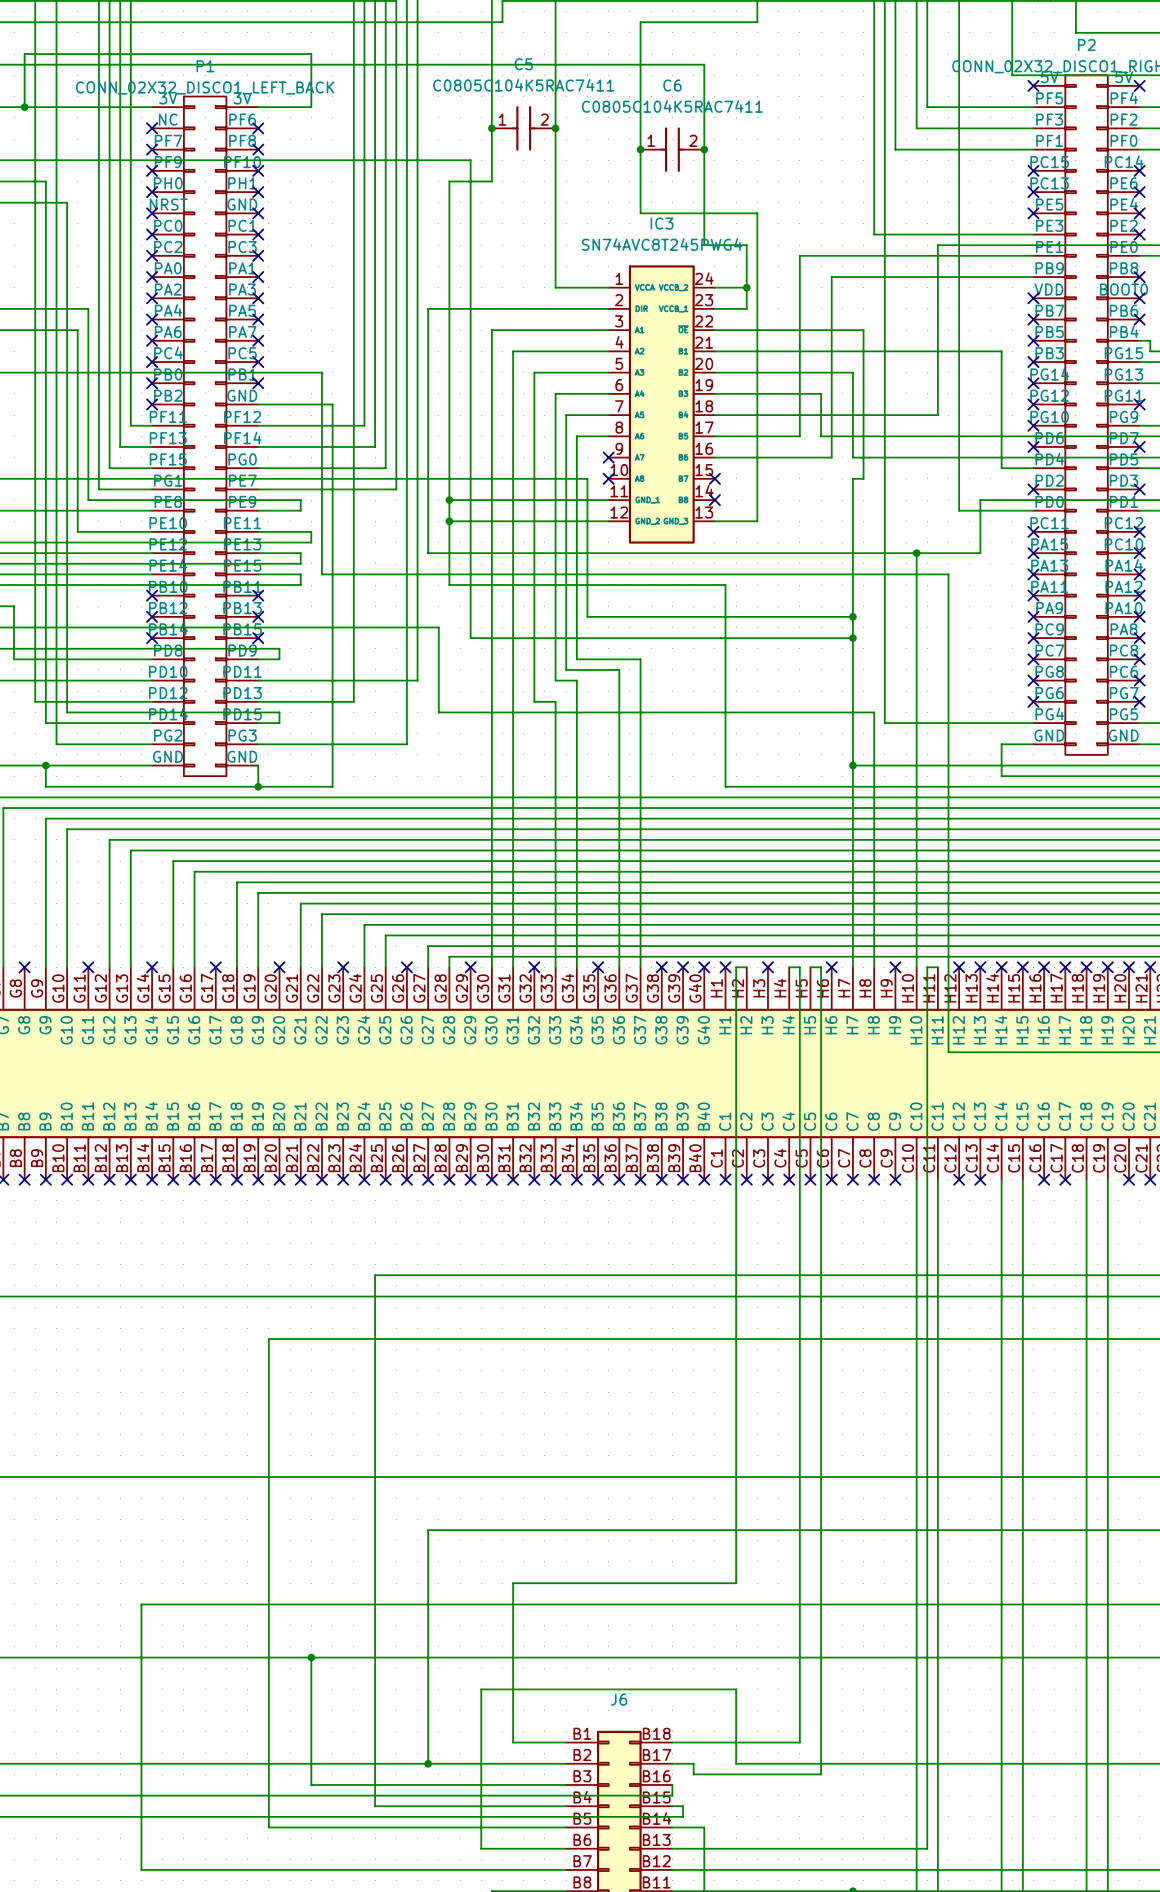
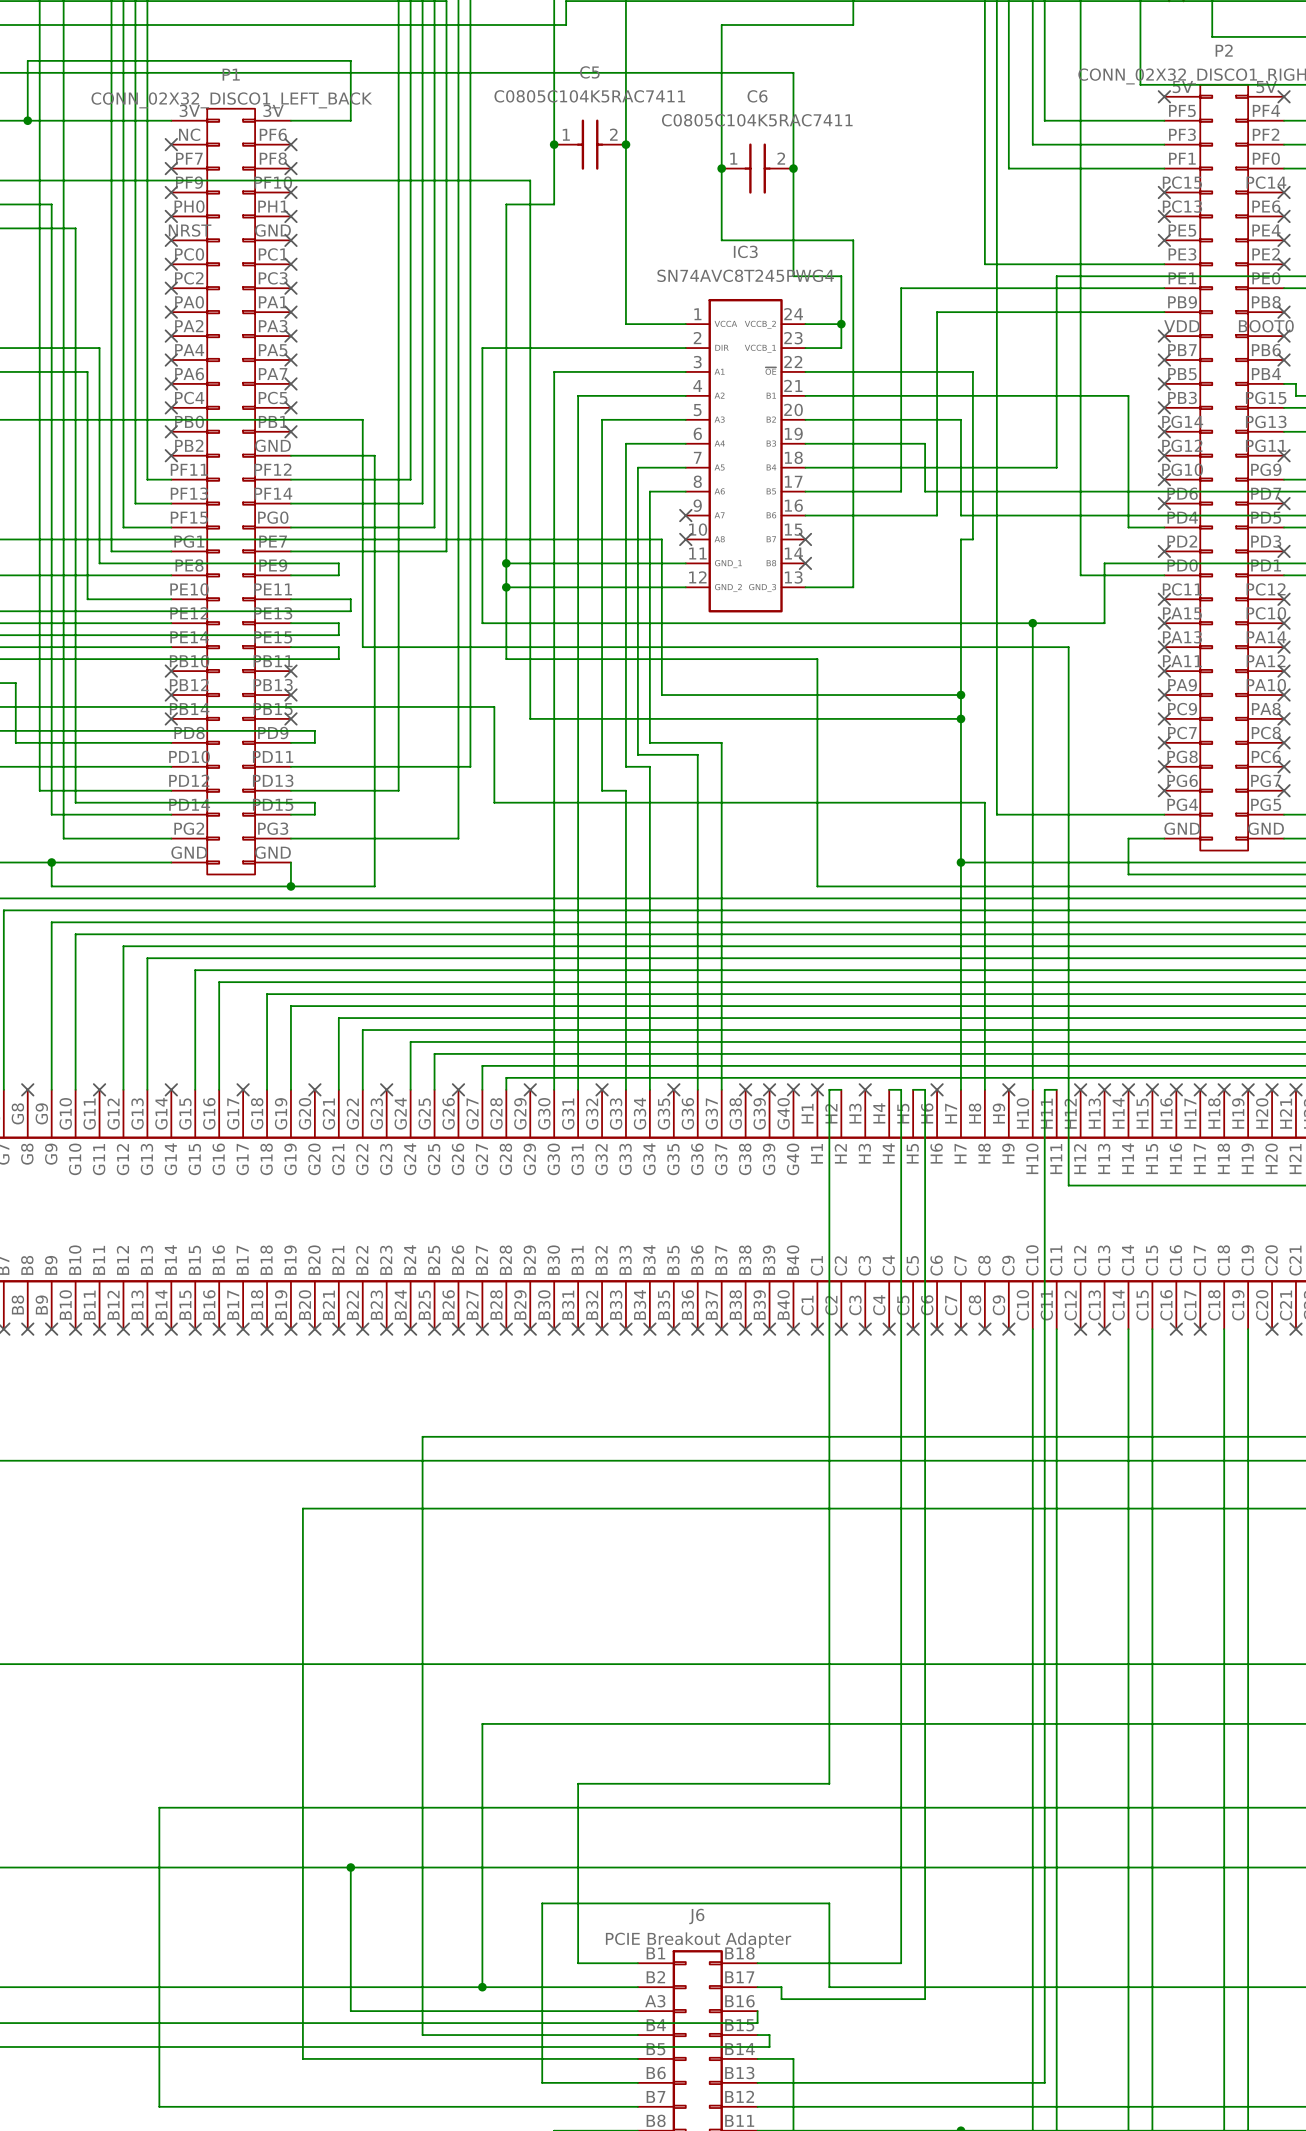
J6 value: none -> PCIE Breakout Adapter (698, 1940)
J6 pin number: B3 (582, 1776) -> A3 (655, 2001)

